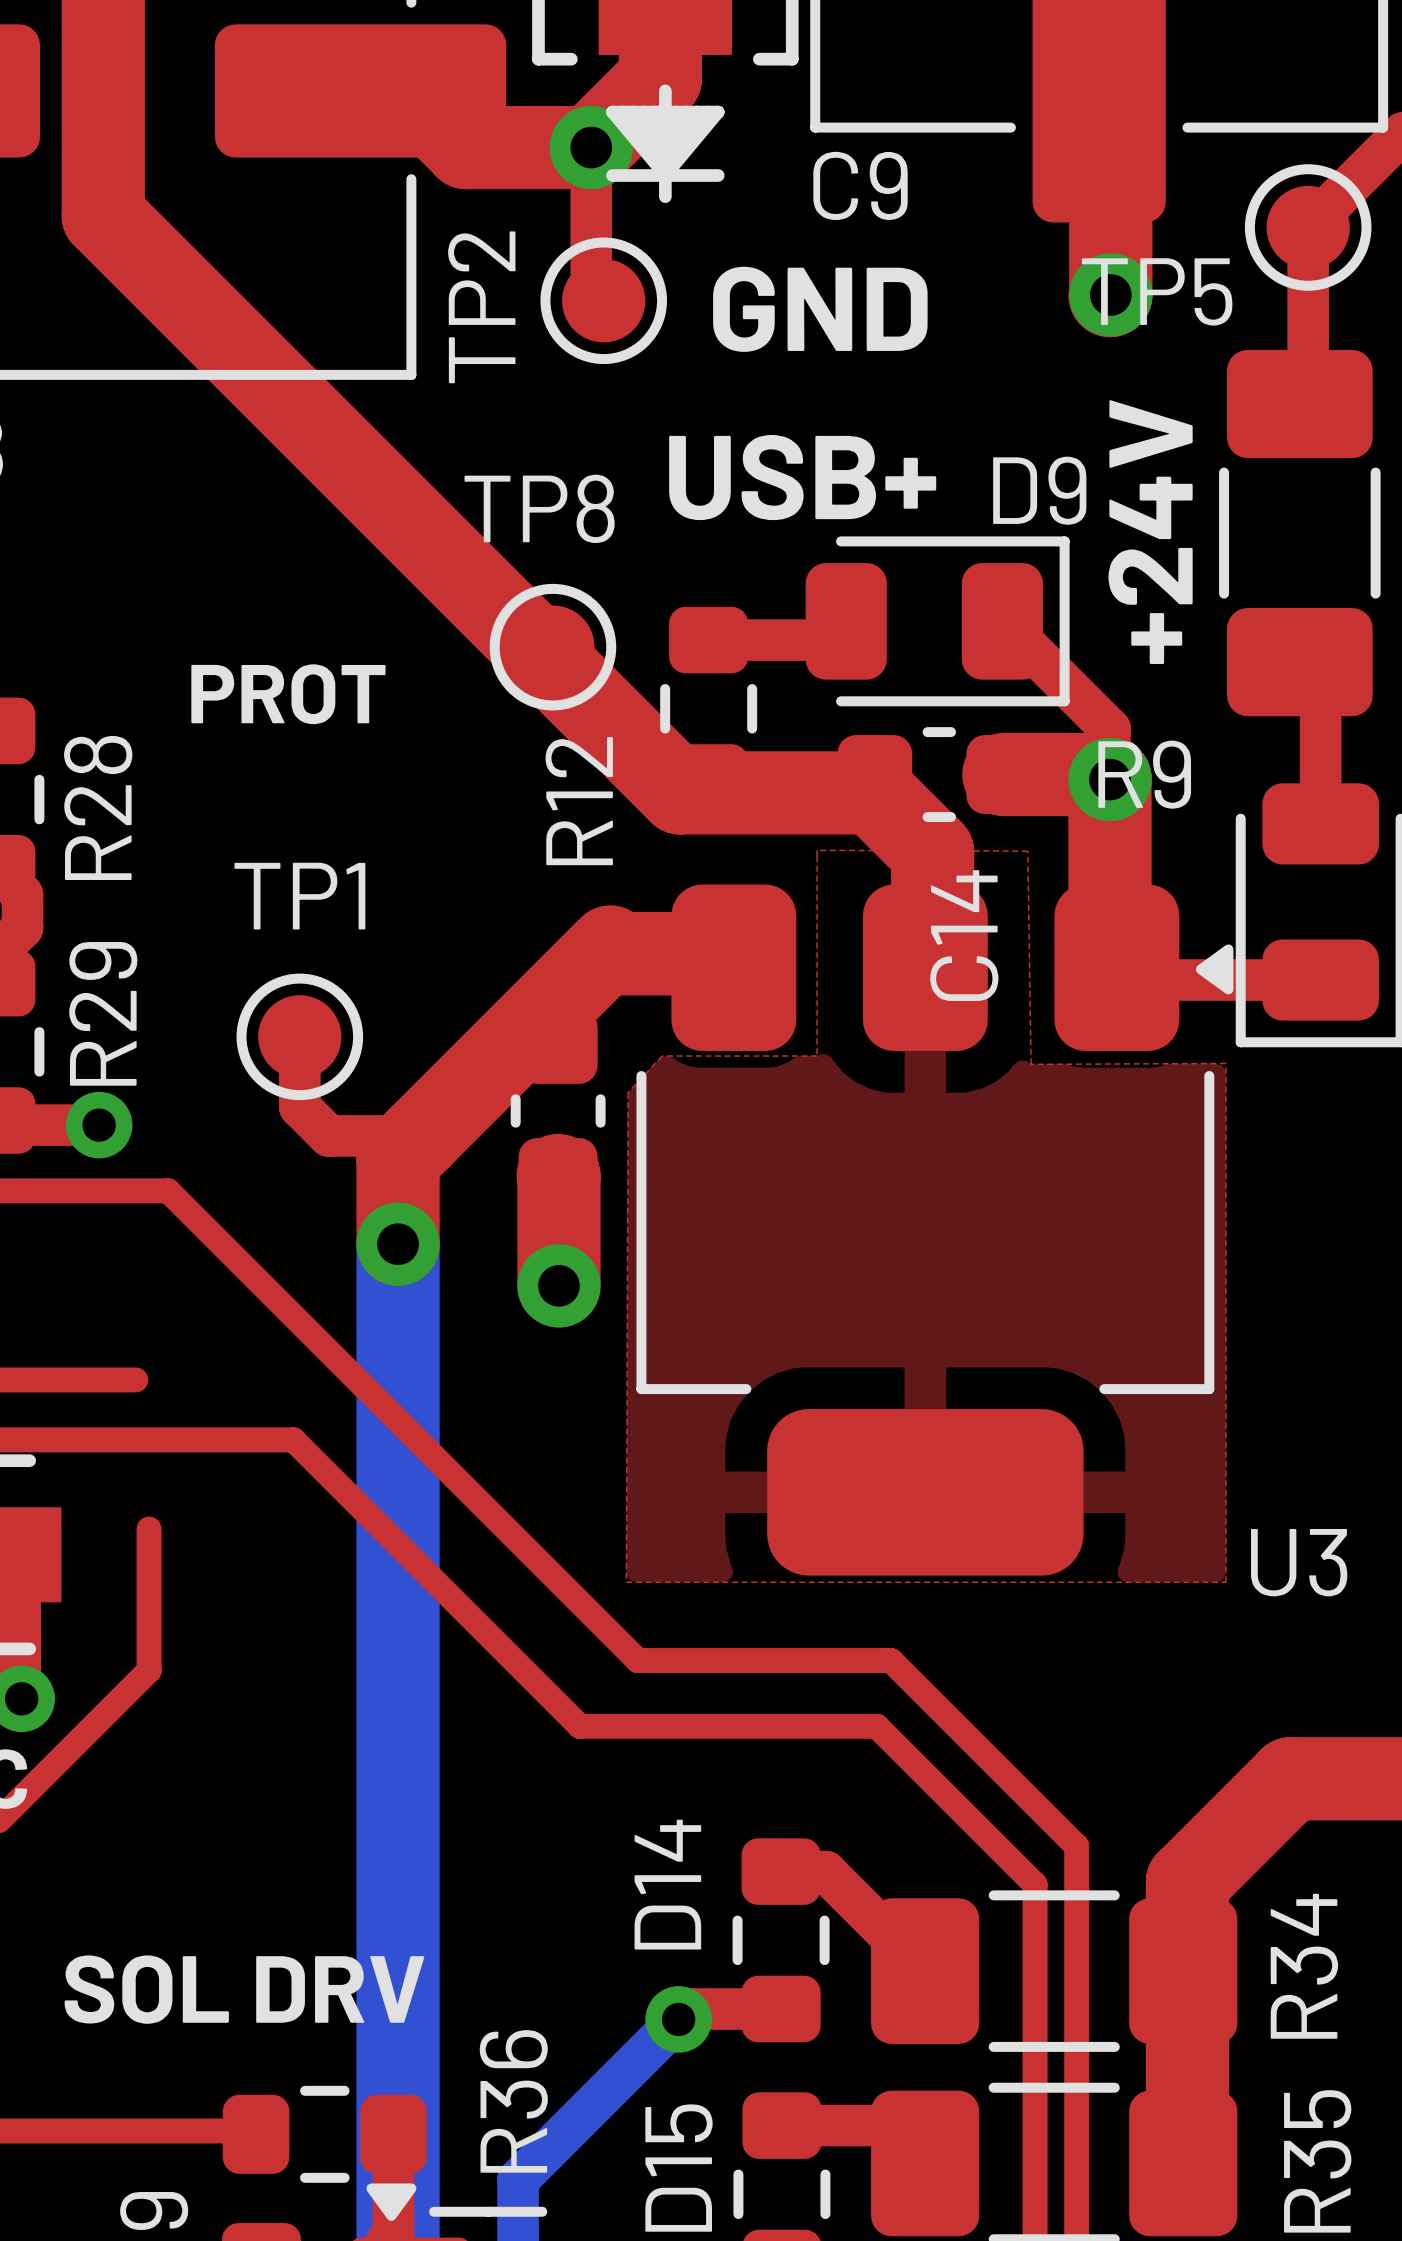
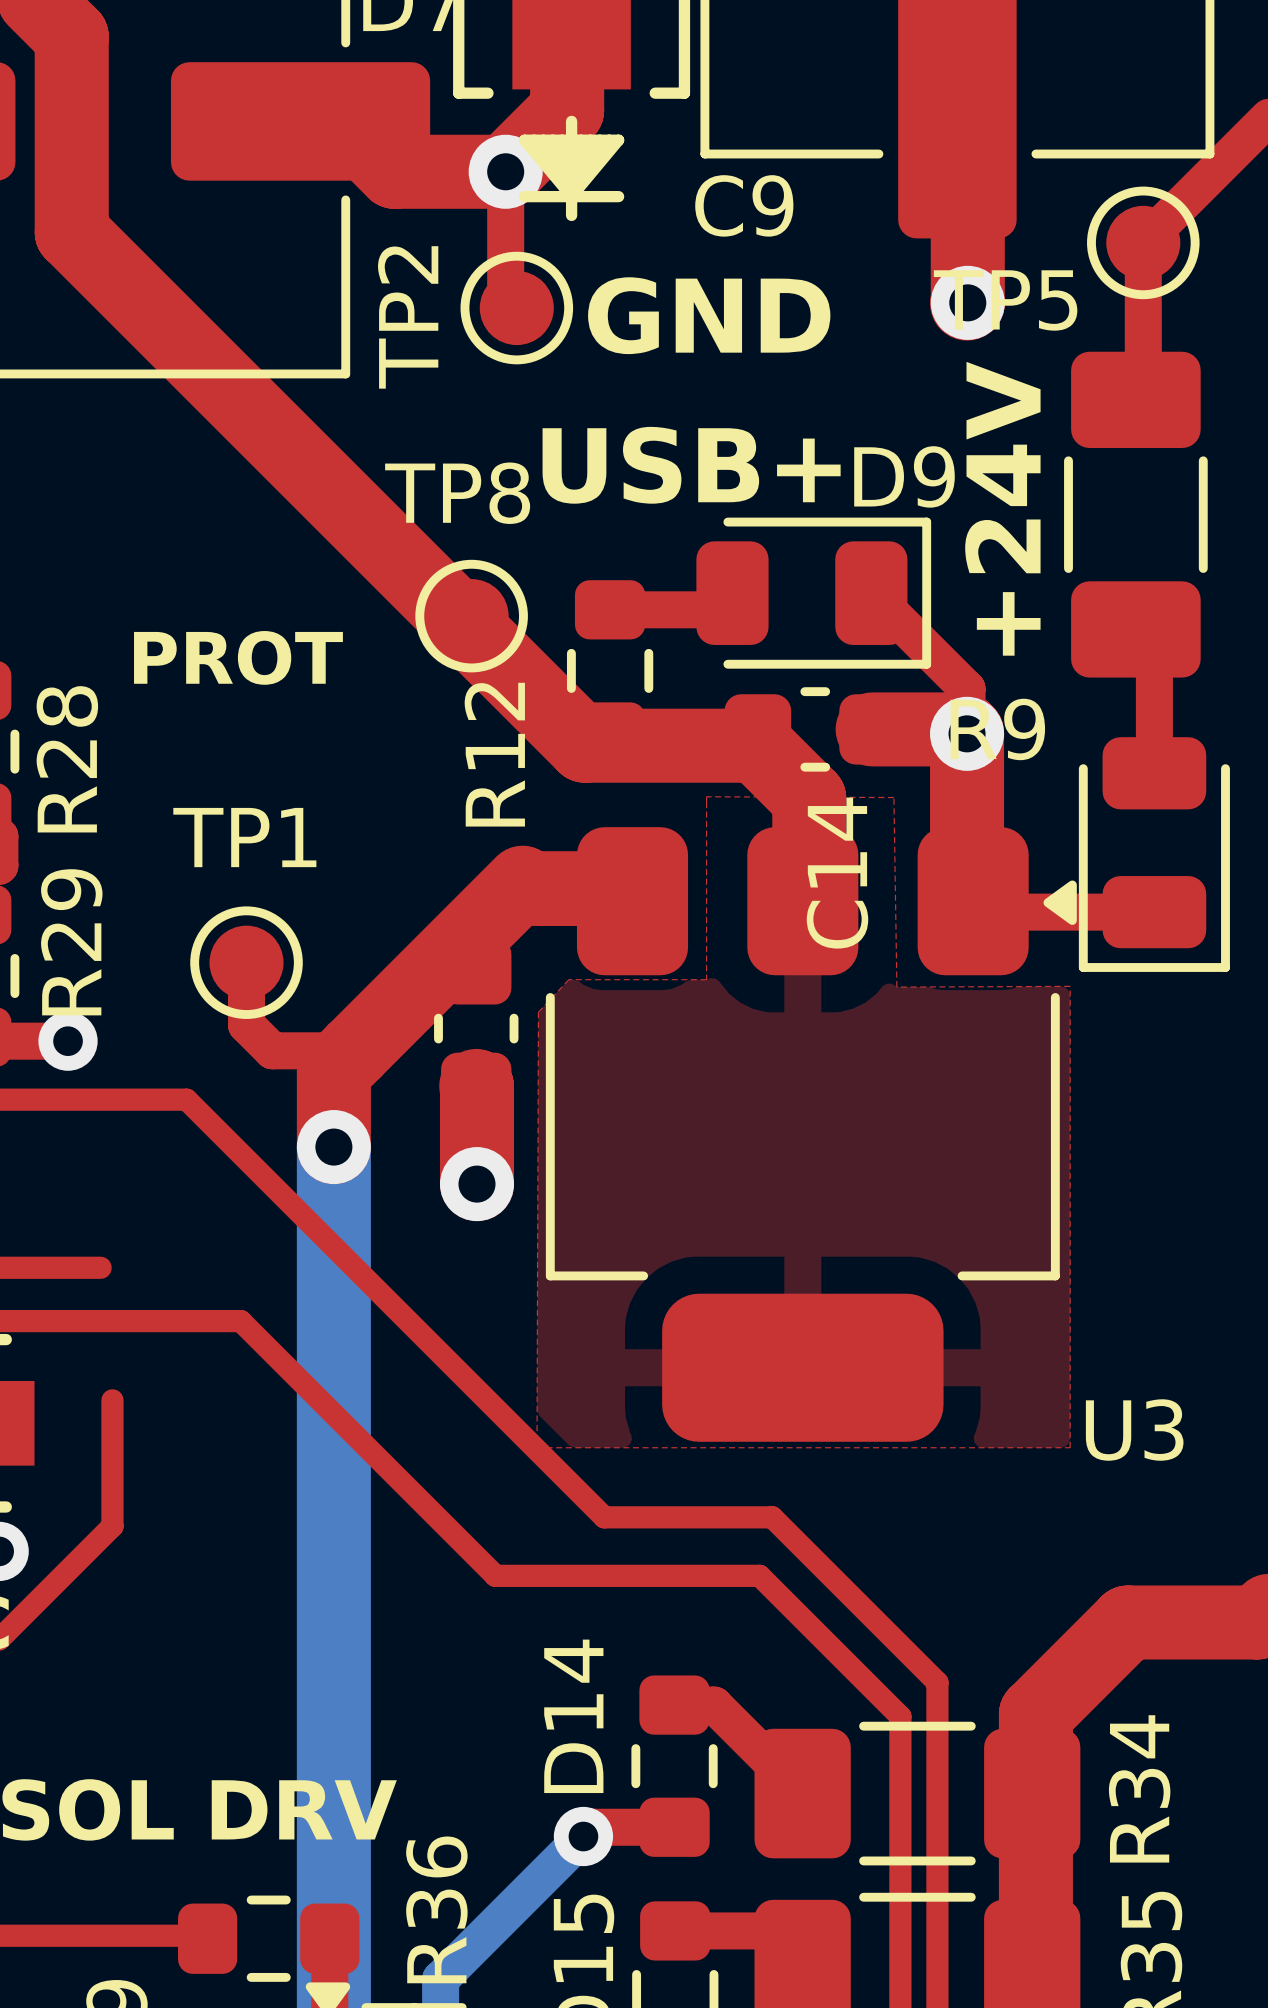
top track: (168, 1190) (637, 1660) (702, 1660) -> (129, 1099) (186, 1099) (604, 1517)

